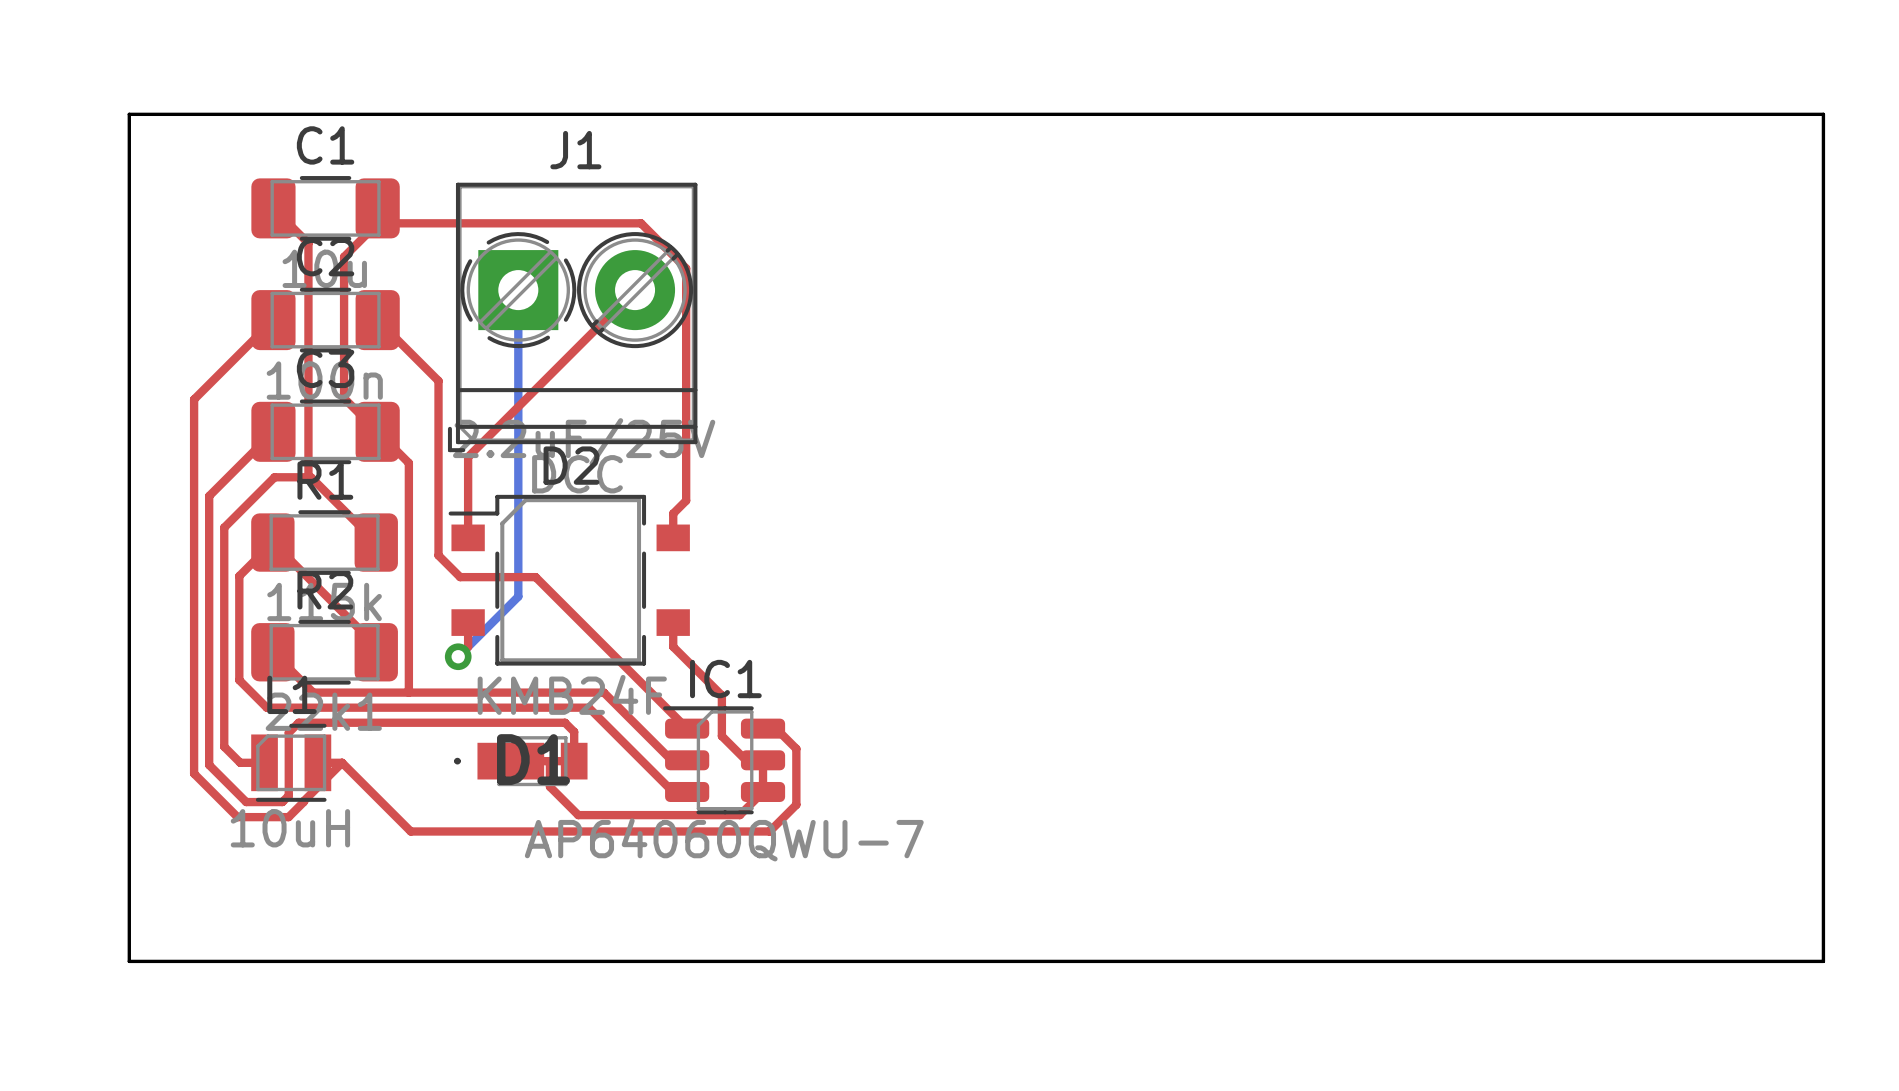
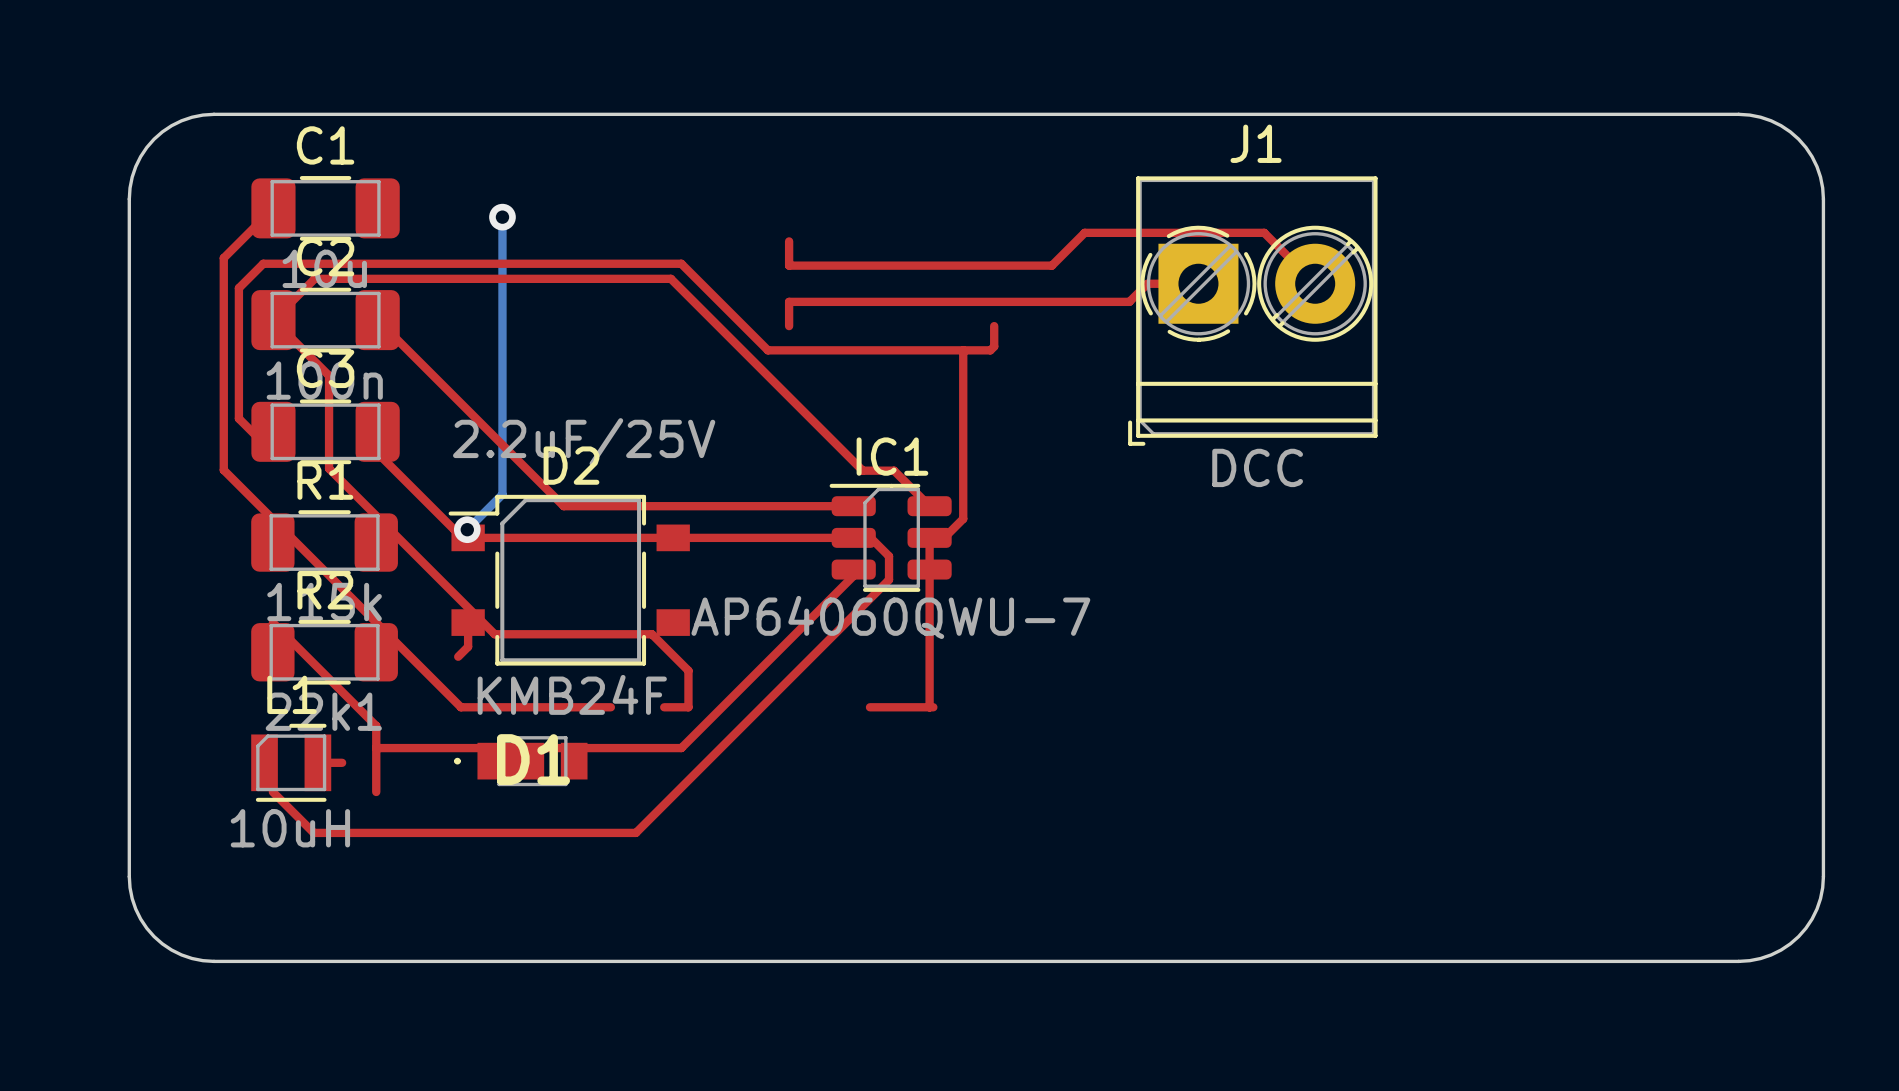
board edge: (214, 114) (129, 114) (129, 199) -> (214, 114) (181, 120) (154, 139) (135, 166) (129, 199)
board edge: (1738, 114) (1823, 114) (1823, 199) -> (1738, 114) (1771, 120) (1798, 139) (1816, 166) (1823, 199)
top track: (273, 208) (308, 243) (308, 477) -> (273, 208) (223, 258) (223, 470) (460, 707) (610, 707)
bottom track: none -> (502, 217) (502, 494) (467, 529)
via: none -> (502, 217)
top track: none -> (789, 241) (789, 265) (1051, 265) (1084, 232) (1264, 232) (1315, 283)
top track: (681, 263) (641, 223) (377, 223) (344, 256) (344, 398) (408, 463) (408, 692) -> (681, 263) (263, 263) (238, 288) (238, 418) (273, 453)
top track: (686, 268) (686, 500) (673, 513) (673, 537) -> (686, 268) (767, 350) (990, 350) (994, 346) (994, 326)
top track: none -> (1198, 283) (1147, 283) (1129, 301) (789, 301) (789, 326)
bottom track: (518, 290) (518, 596) (458, 656) -> none
top track: (635, 290) (468, 457) (468, 537) -> none
J1 position: (572, 317) -> (1252, 311)
top track: (273, 320) (194, 399) (194, 773) (237, 817) (288, 817) (342, 762) (410, 831) (769, 831) (796, 804) (796, 748) (776, 728) (763, 728) -> none
top track: none -> (963, 350) (963, 518) (944, 537) (929, 537) (929, 707)
top track: (438, 380) (438, 555) (460, 577) (535, 577) (687, 728) -> (438, 380) (563, 506) (853, 506)
top track: (273, 431) (209, 496) (209, 765) (246, 802) (282, 802) (288, 795) (288, 732) (298, 722) (565, 722) (574, 731) (574, 761) (510, 761) -> none
top track: none -> (377, 453) (454, 529) (467, 529) (475, 537) (870, 537) (889, 556) (889, 579) (635, 832) (313, 832) (272, 791)
top track: none -> (929, 506) (894, 470) (862, 470) (670, 278) (314, 278) (273, 320) (329, 375) (329, 468) (494, 634) (651, 634) (688, 670) (688, 707) (664, 707)
top track: (376, 542) (310, 477) (274, 477) (224, 527) (224, 746) (240, 762) (264, 762) -> none
top track: none -> (853, 569) (853, 575) (681, 748) (376, 748)
top track: none -> (272, 622) (376, 725) (376, 791)
top track: (673, 622) (673, 646) (721, 695) (721, 736) (746, 760) (763, 760) (763, 791) (739, 815) (578, 815) (549, 786) (549, 761) -> none
top track: (272, 652) (313, 692) (603, 692) (671, 760) (687, 760) -> none
top track: (376, 652) (376, 645) (272, 542) (239, 576) (239, 680) (266, 707) (588, 707) (673, 791) (687, 791) -> none
via position: (458, 656) -> (467, 529)
top track: none -> (869, 707) (933, 707)
IC1 position: (724, 760) -> (890, 537)
board edge: (129, 876) (129, 961) (214, 961) -> (129, 876) (135, 909) (154, 936) (181, 954) (214, 961)
board edge: (1823, 876) (1823, 961) (1738, 961) -> (1823, 876) (1816, 909) (1798, 936) (1771, 954) (1738, 961)

